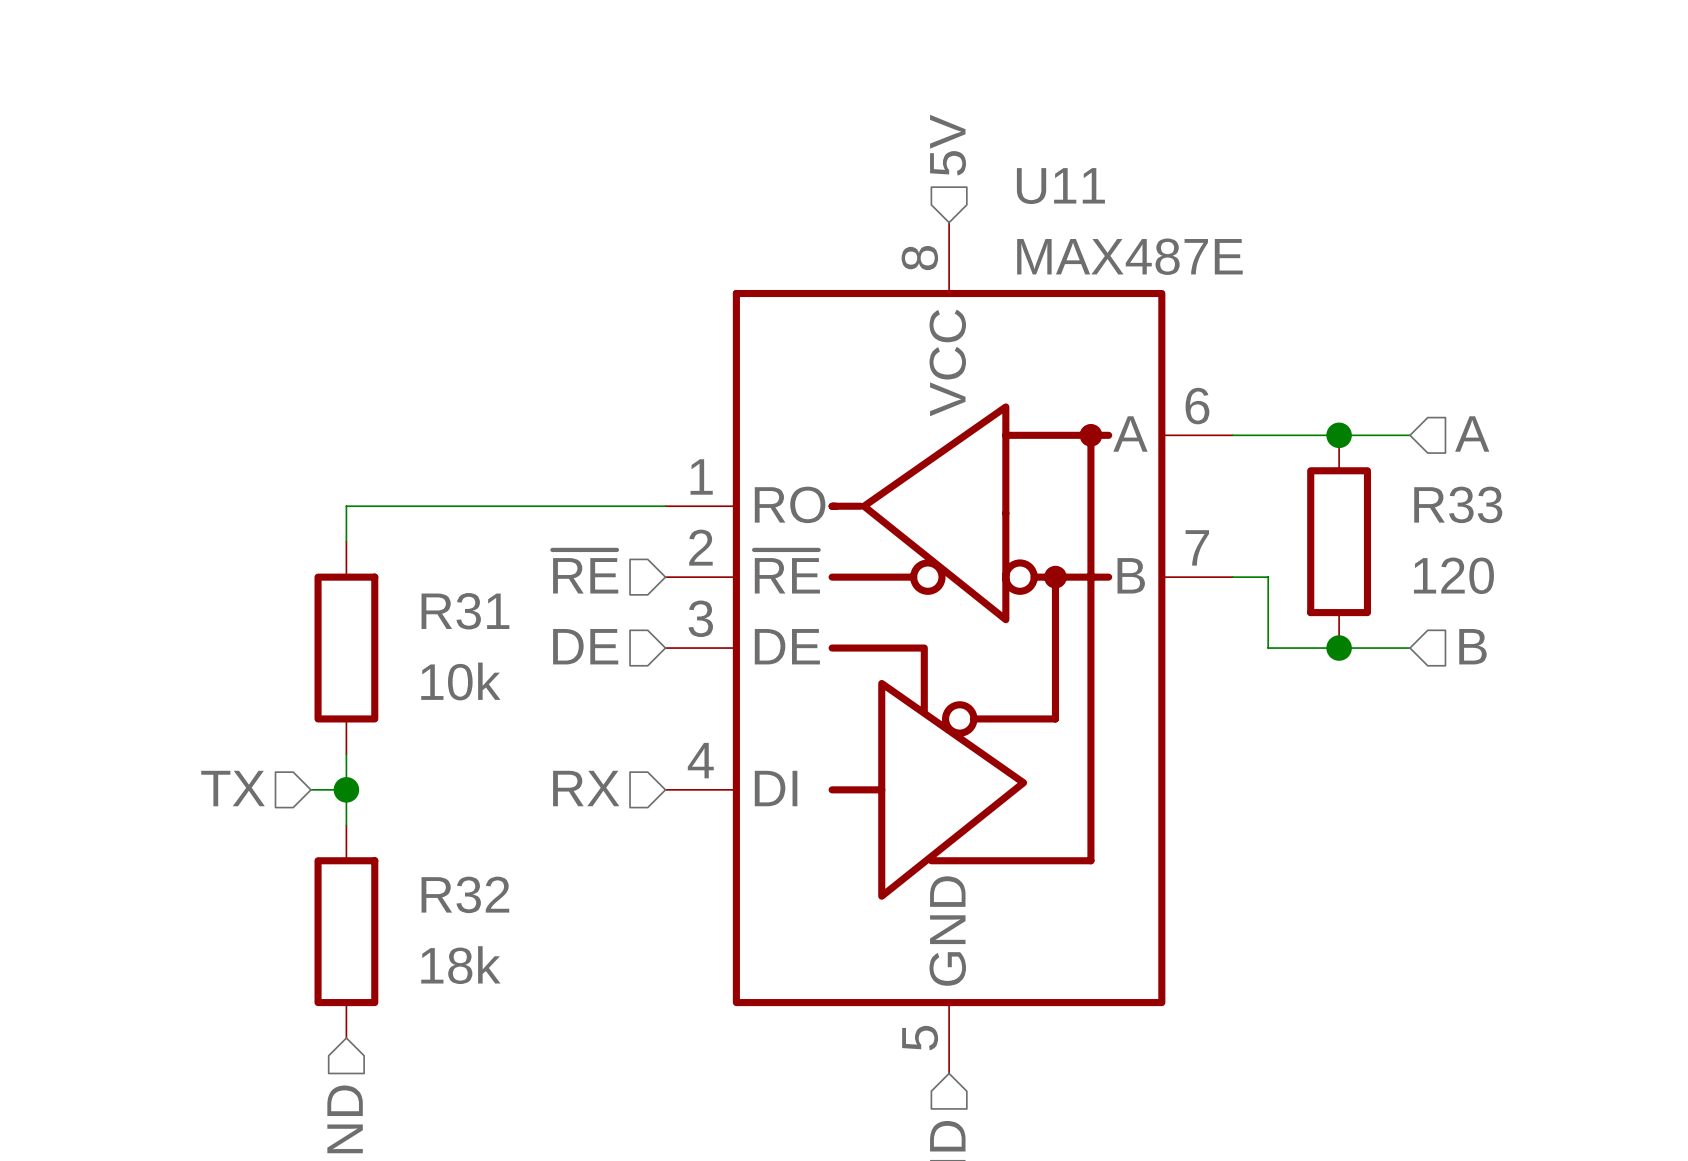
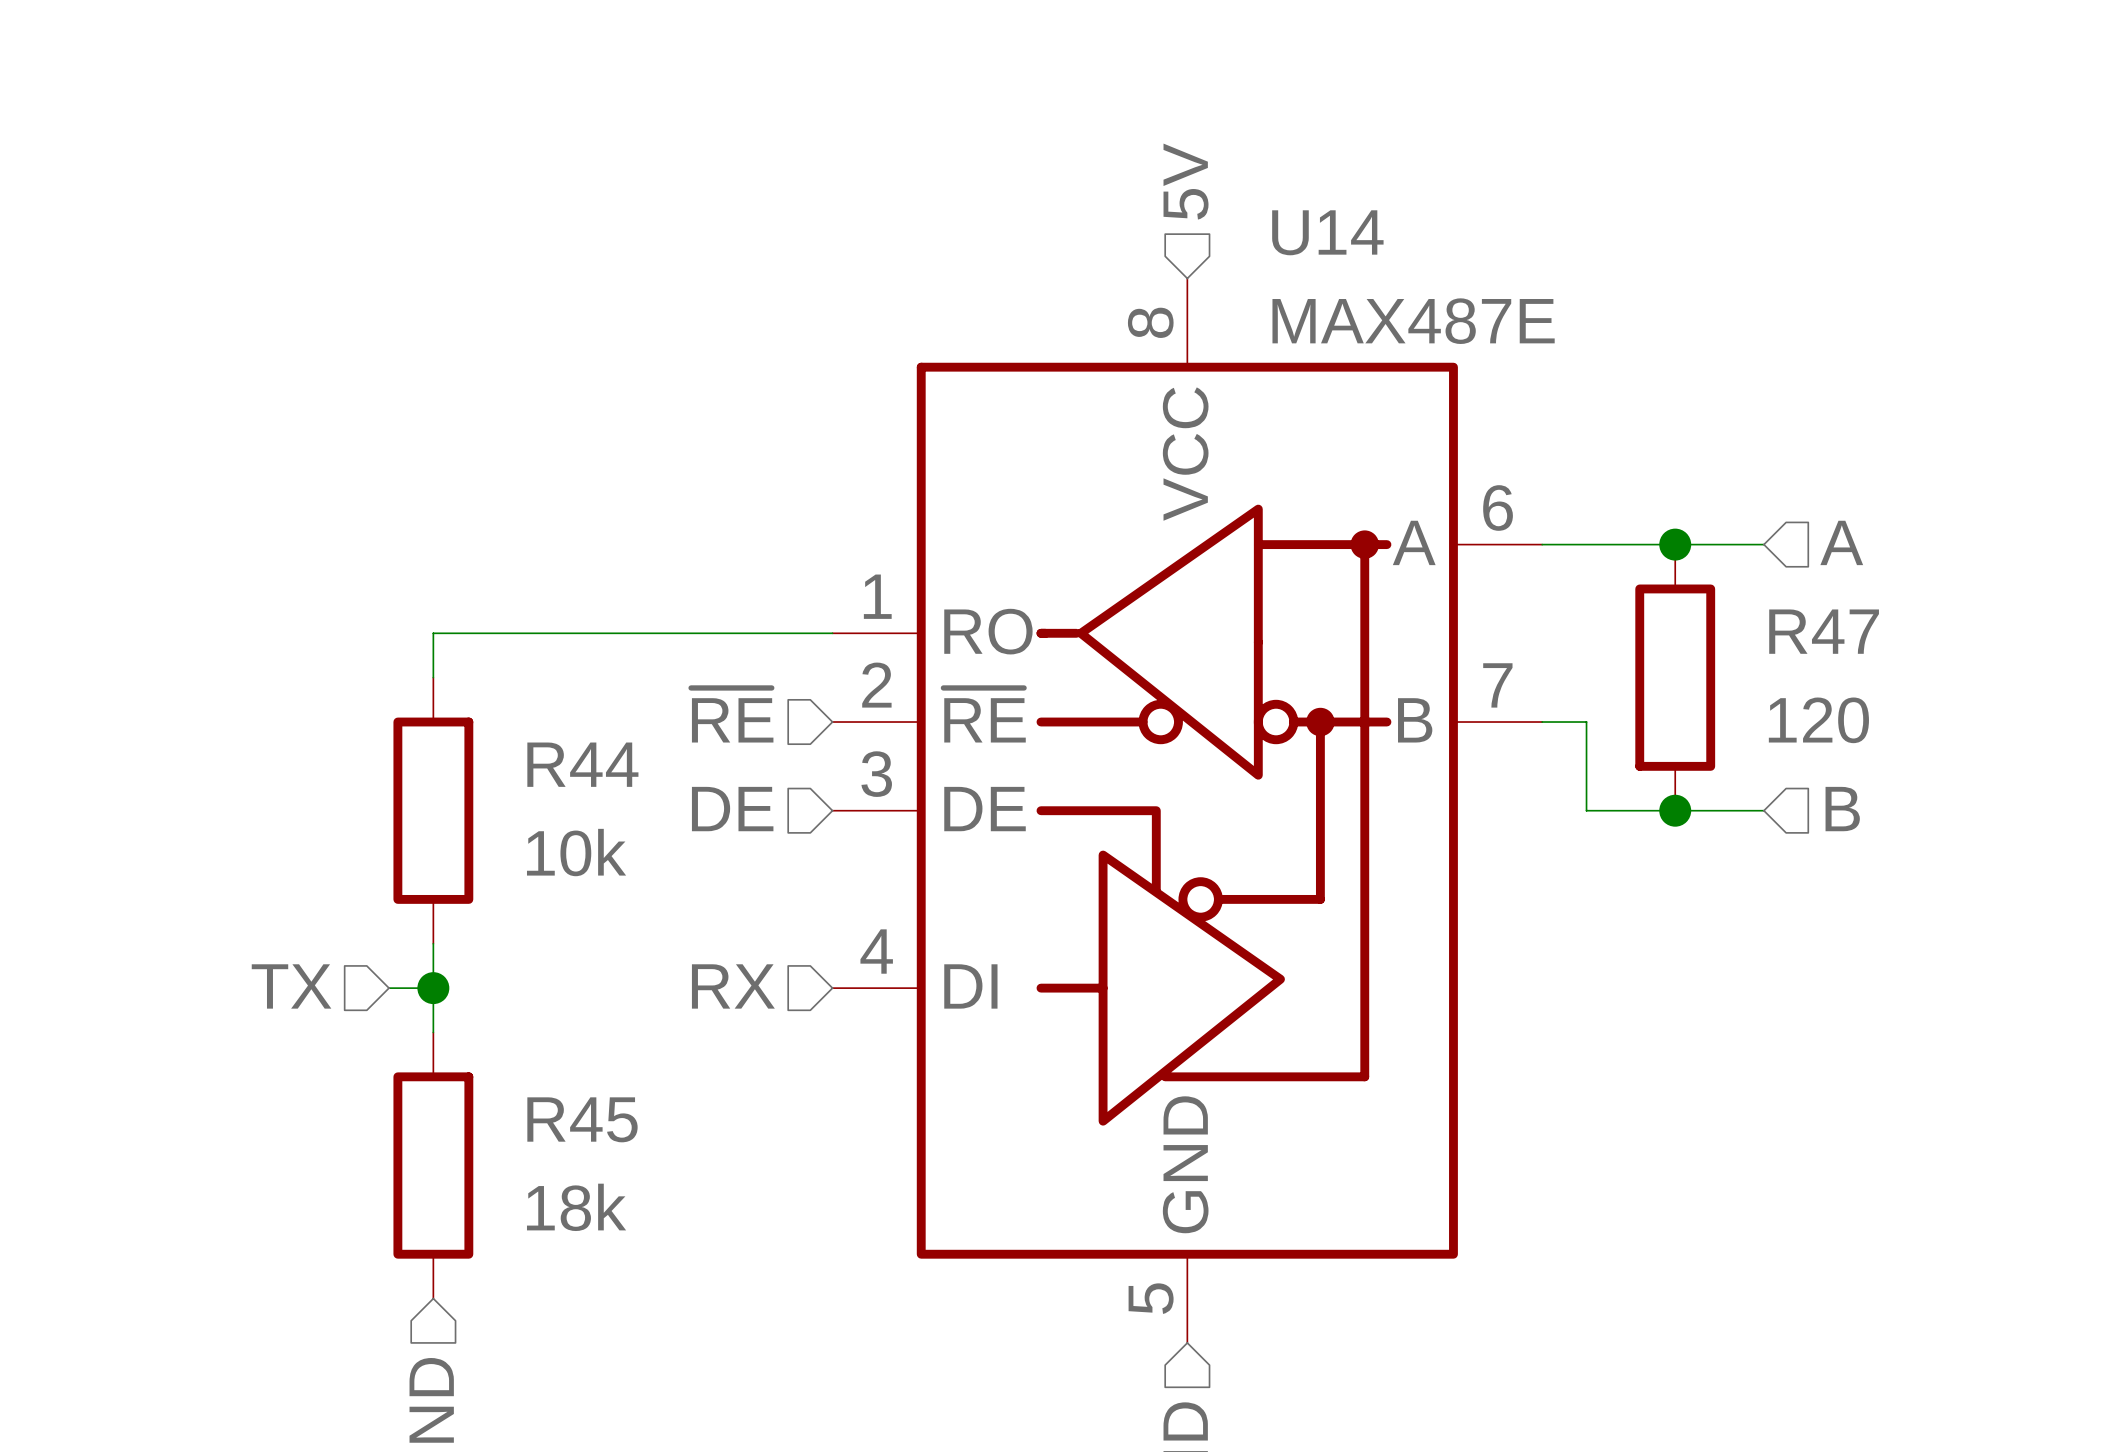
U11 name: U11 (1060, 186) -> U14 (1327, 232)
R33 name: R33 (1458, 504) -> R47 (1824, 631)
R31 name: R31 (465, 611) -> R44 (582, 764)
R32 name: R32 (465, 894) -> R45 (582, 1119)

